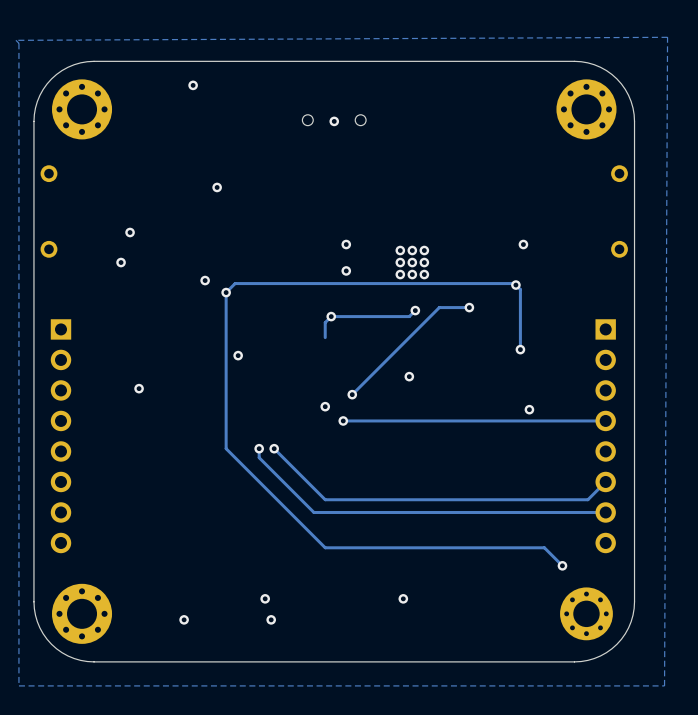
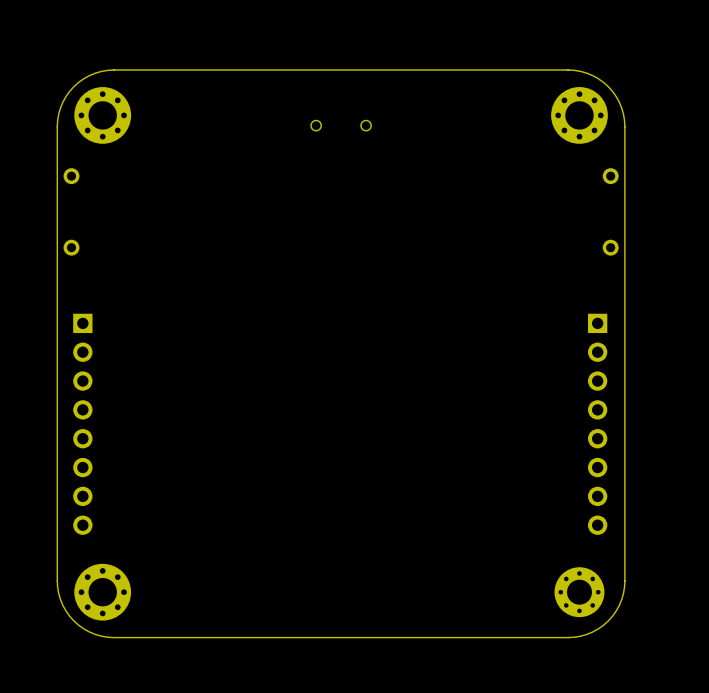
zone outline: (667, 37) (664, 685) (18, 685) (18, 43) (15, 40) (667, 37) -> none
via: (193, 85) -> none
via: (334, 121) -> none
via: (217, 187) -> none
via: (130, 232) -> none
via: (346, 244) -> none
via: (523, 244) -> none
via: (400, 250) -> none
via: (412, 250) -> none
via: (424, 250) -> none
via: (121, 262) -> none
via: (400, 262) -> none
via: (412, 262) -> none
via: (424, 262) -> none
via: (346, 270) -> none
via: (400, 274) -> none
via: (412, 274) -> none
via: (424, 274) -> none
via: (205, 280) -> none
via: (515, 285) -> none
via: (226, 292) -> none
track: (469, 307) (439, 307) (352, 394) -> none
via: (469, 307) -> none
track: (415, 310) (409, 316) (331, 316) (325, 322) (325, 337) -> none
via: (415, 310) -> none
via: (331, 316) -> none
track: (520, 349) (520, 289) (514, 283) (235, 283) (226, 292) (226, 448) (325, 547) (544, 547) (562, 565) -> none
via: (520, 349) -> none
via: (238, 355) -> none
via: (409, 376) -> none
via: (139, 388) -> none
via: (352, 394) -> none
via: (325, 406) -> none
via: (529, 409) -> none
via: (343, 420) -> none
track: (605, 420) (343, 420) -> none
track: (259, 448) (259, 457) (313, 512) (605, 512) -> none
via: (259, 448) -> none
track: (274, 448) (325, 499) (587, 499) (605, 481) -> none
via: (274, 448) -> none
via: (562, 565) -> none
via: (265, 598) -> none
via: (403, 598) -> none
via: (184, 619) -> none
via: (271, 619) -> none

